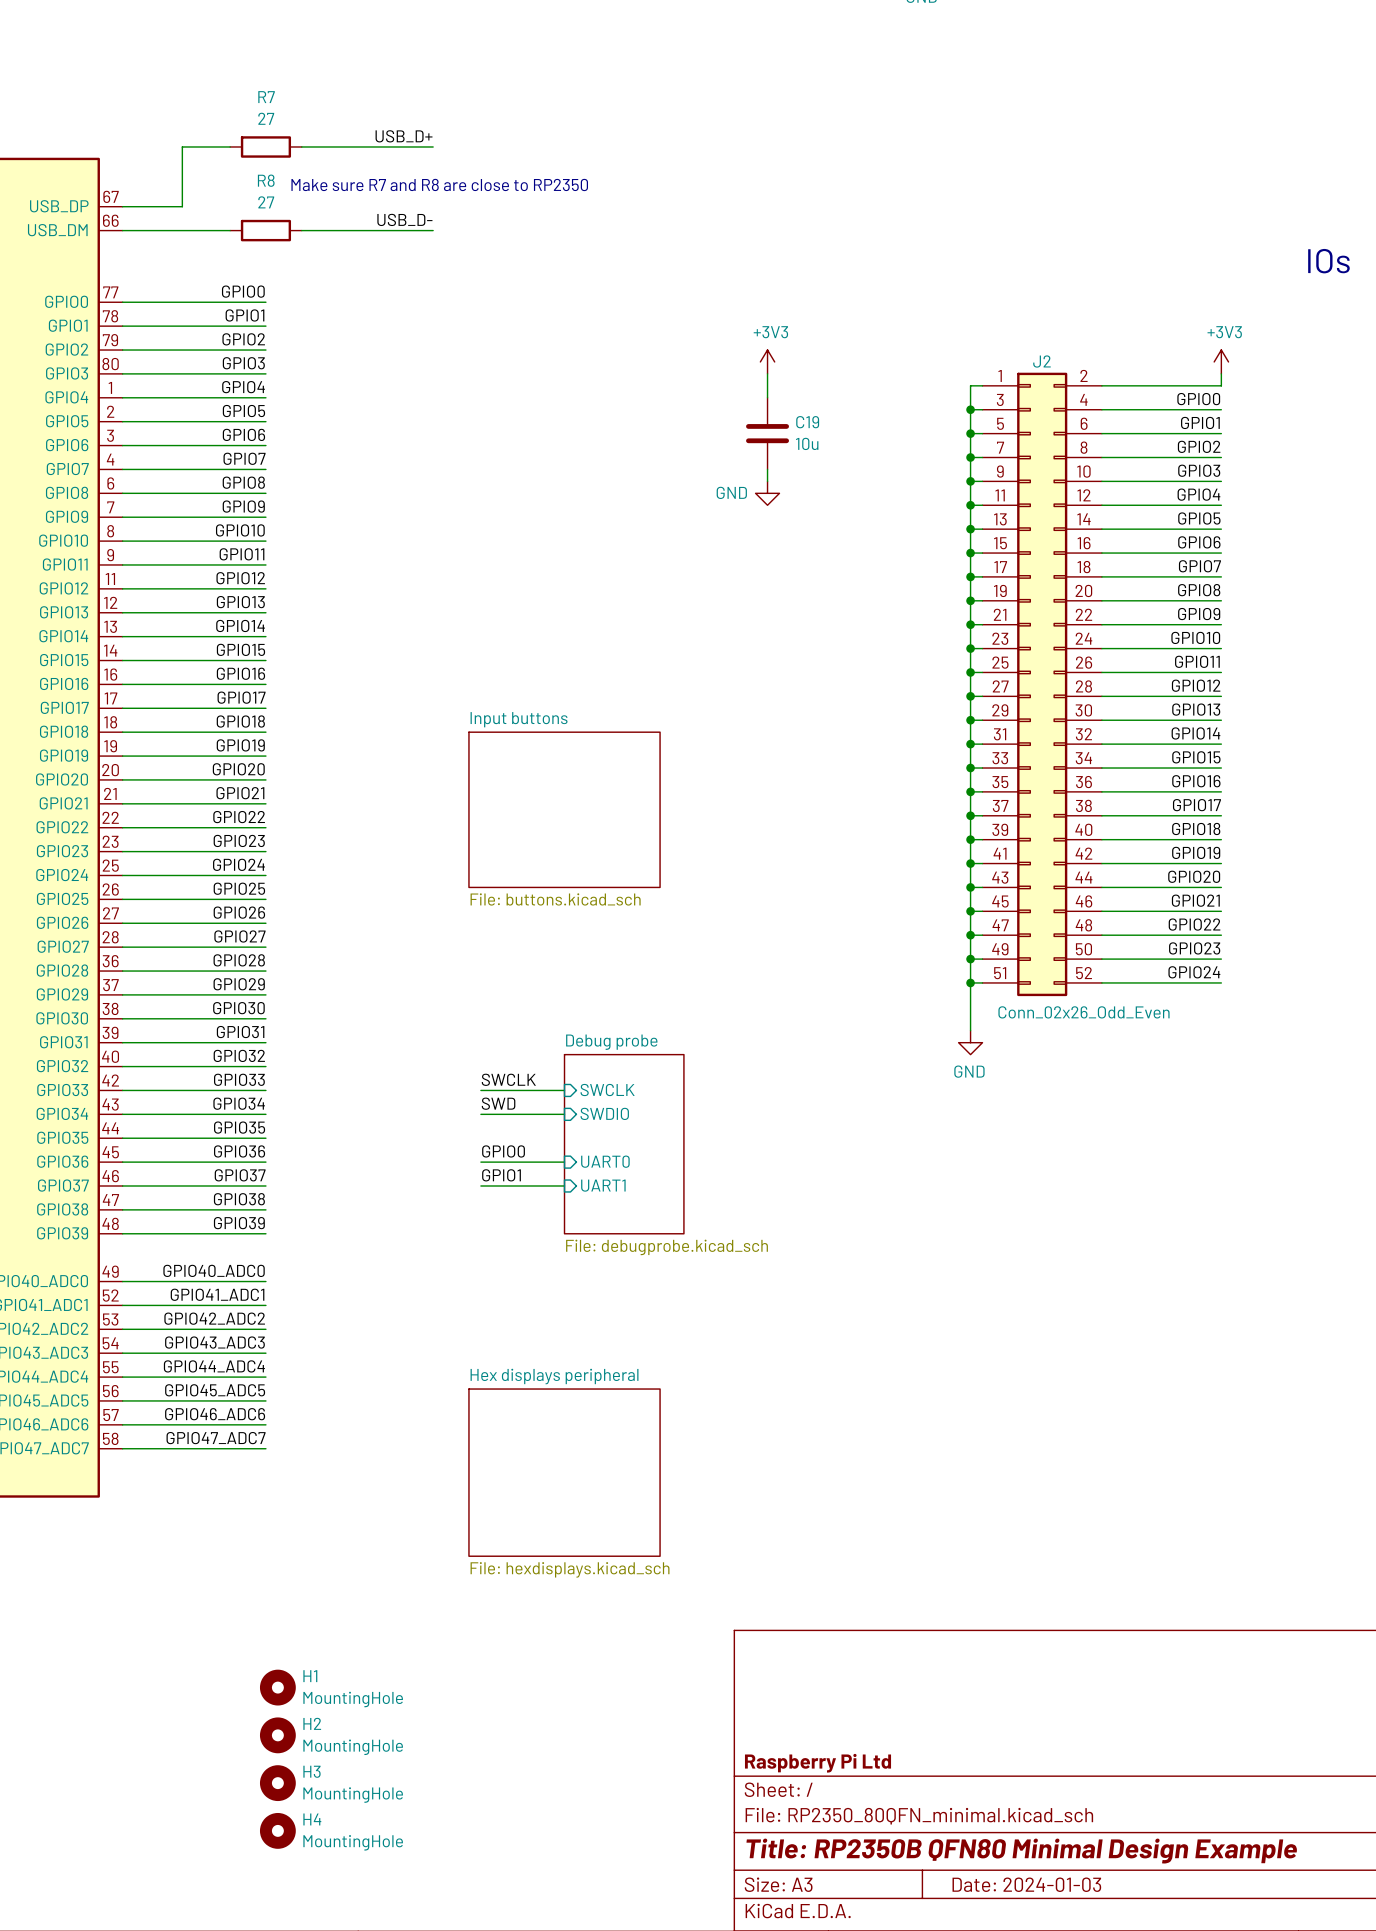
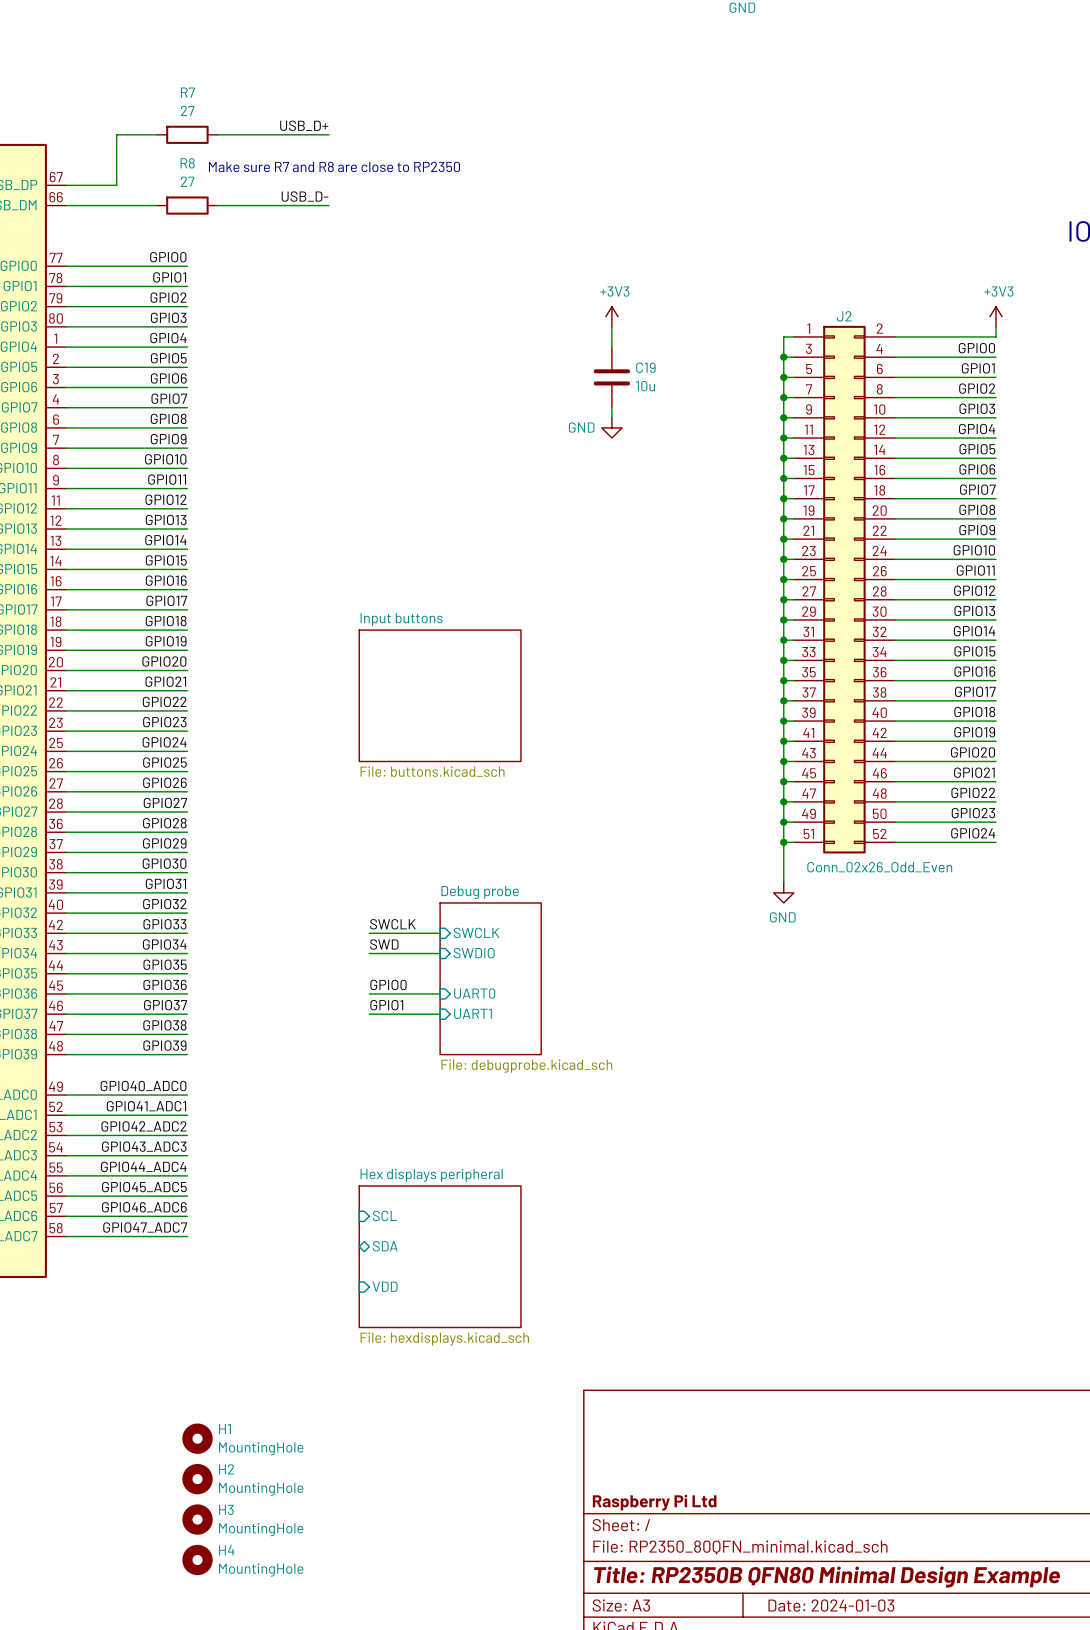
sheet pin: none -> SCL (384, 1215)
sheet pin: none -> SDA (385, 1246)
sheet pin: none -> VDD (385, 1286)

